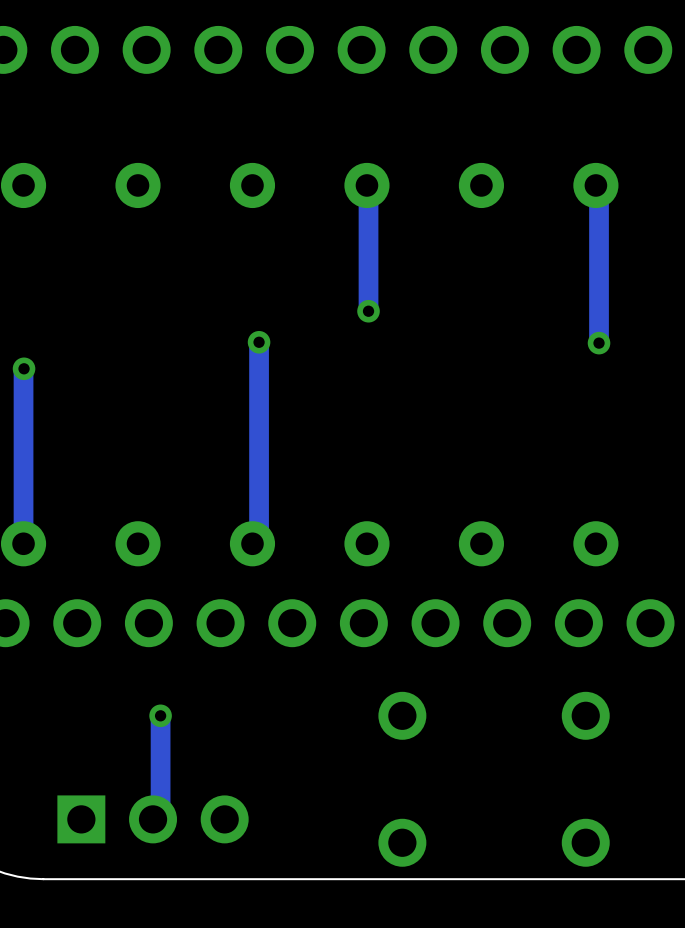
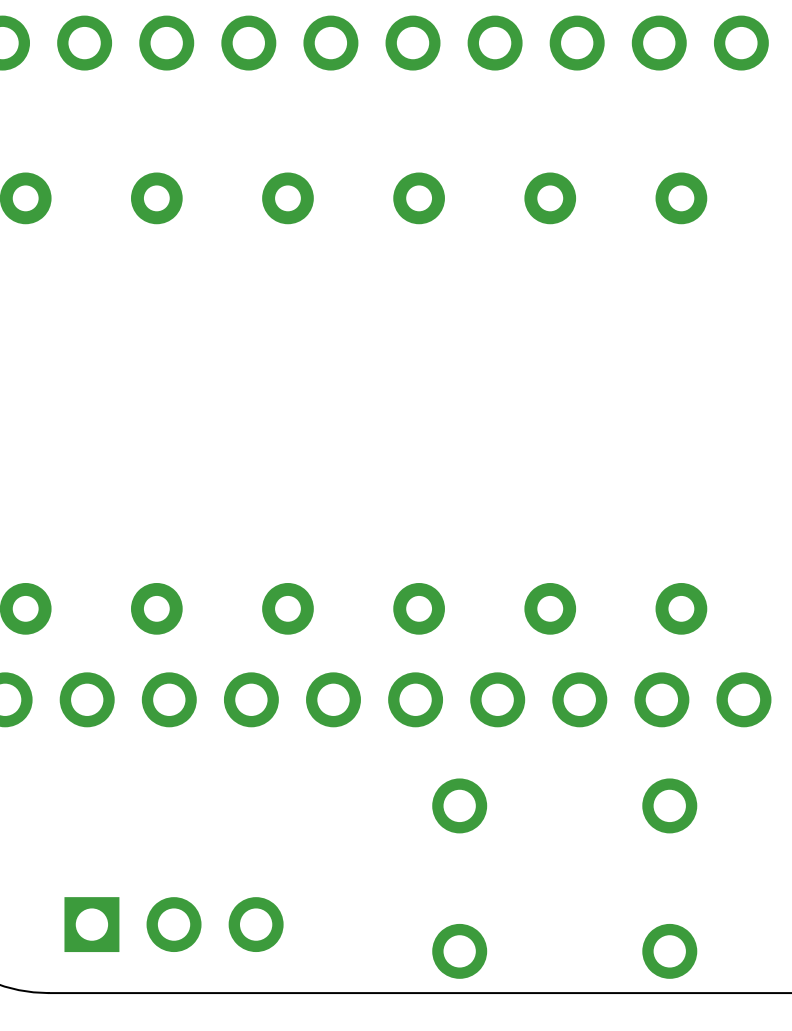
track: (366, 185) (368, 187) (368, 311) -> none
track: (595, 185) (599, 188) (599, 343) -> none
via: (368, 311) -> none
track: (259, 342) (259, 537) (252, 543) -> none
via: (259, 342) -> none
via: (599, 343) -> none
track: (24, 368) (23, 543) -> none
via: (24, 368) -> none
track: (160, 715) (160, 811) (153, 819) -> none
via: (160, 715) -> none

